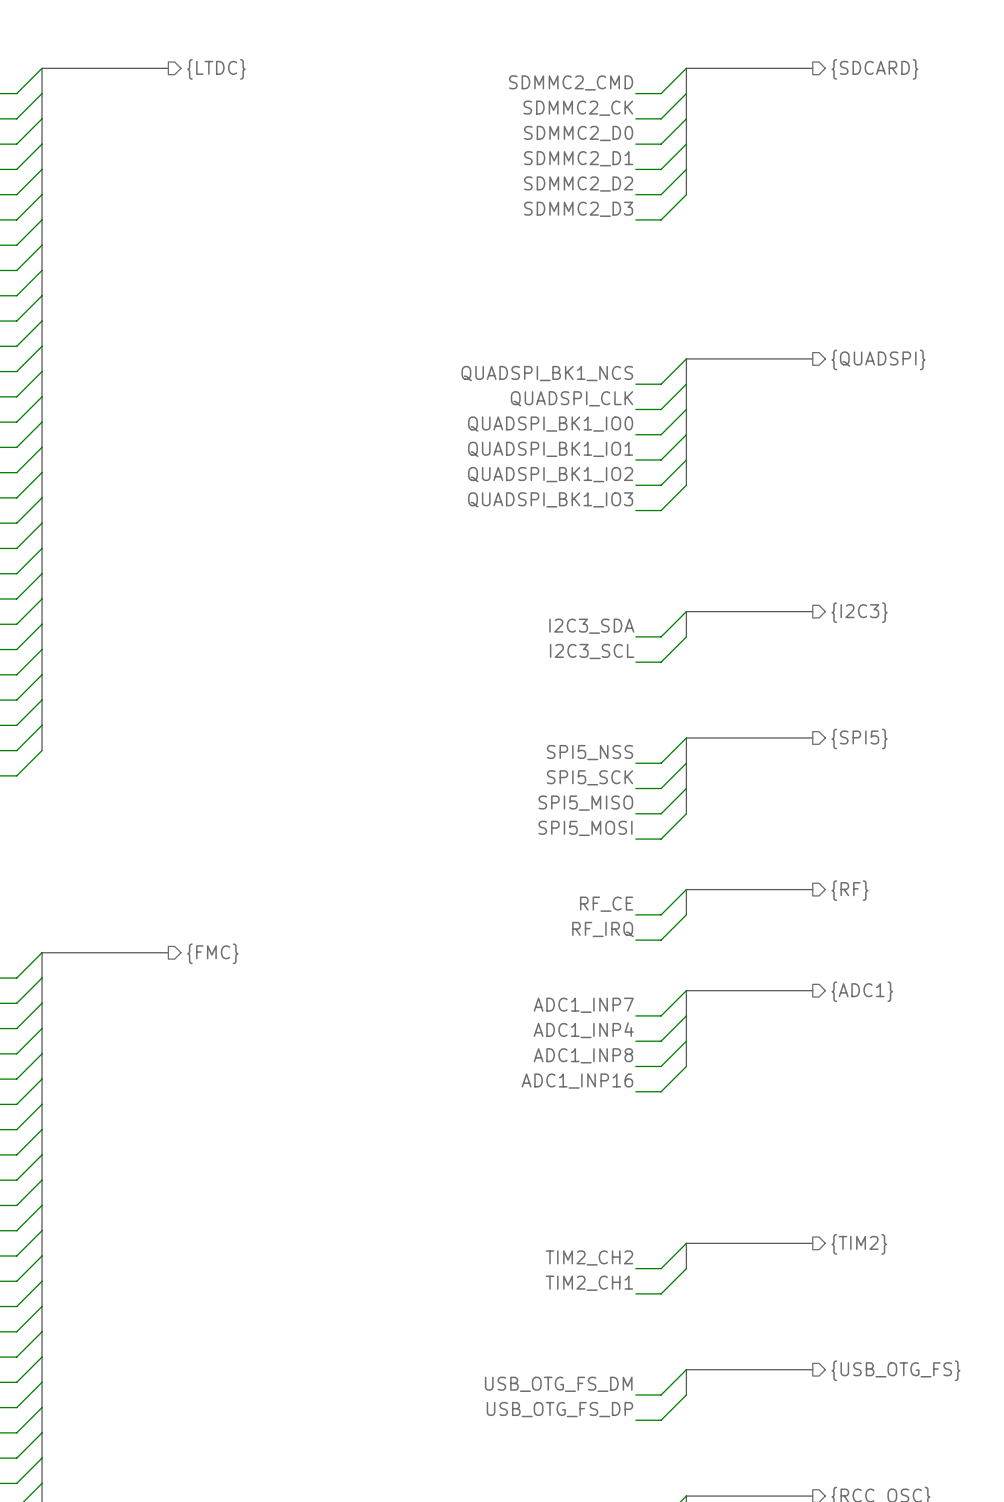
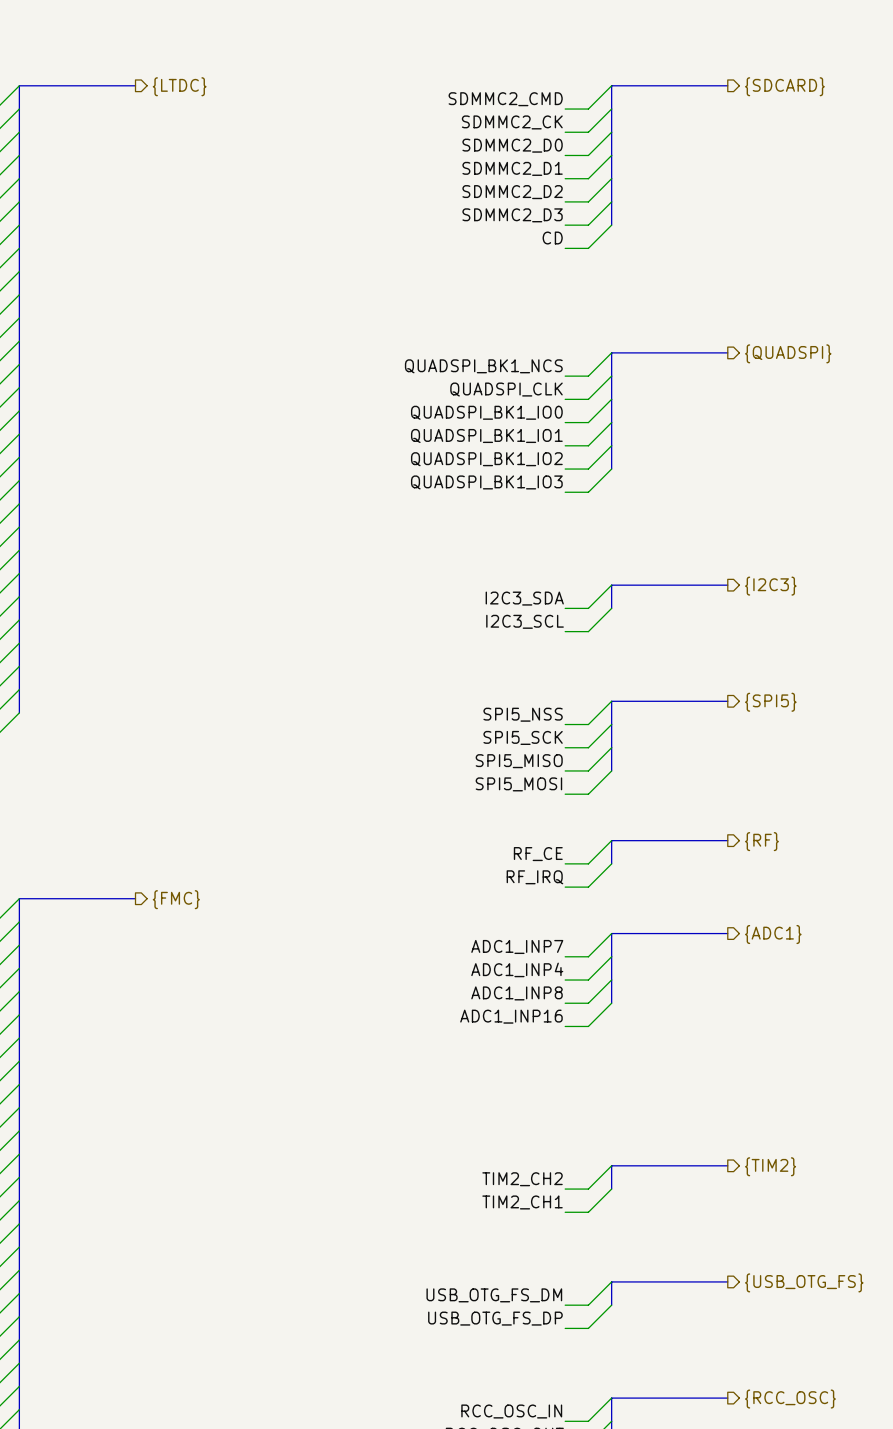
bus: none -> (611, 201) (611, 225)
wire: none -> (611, 225) (588, 248) (565, 248)
label: none -> CD (552, 238)

